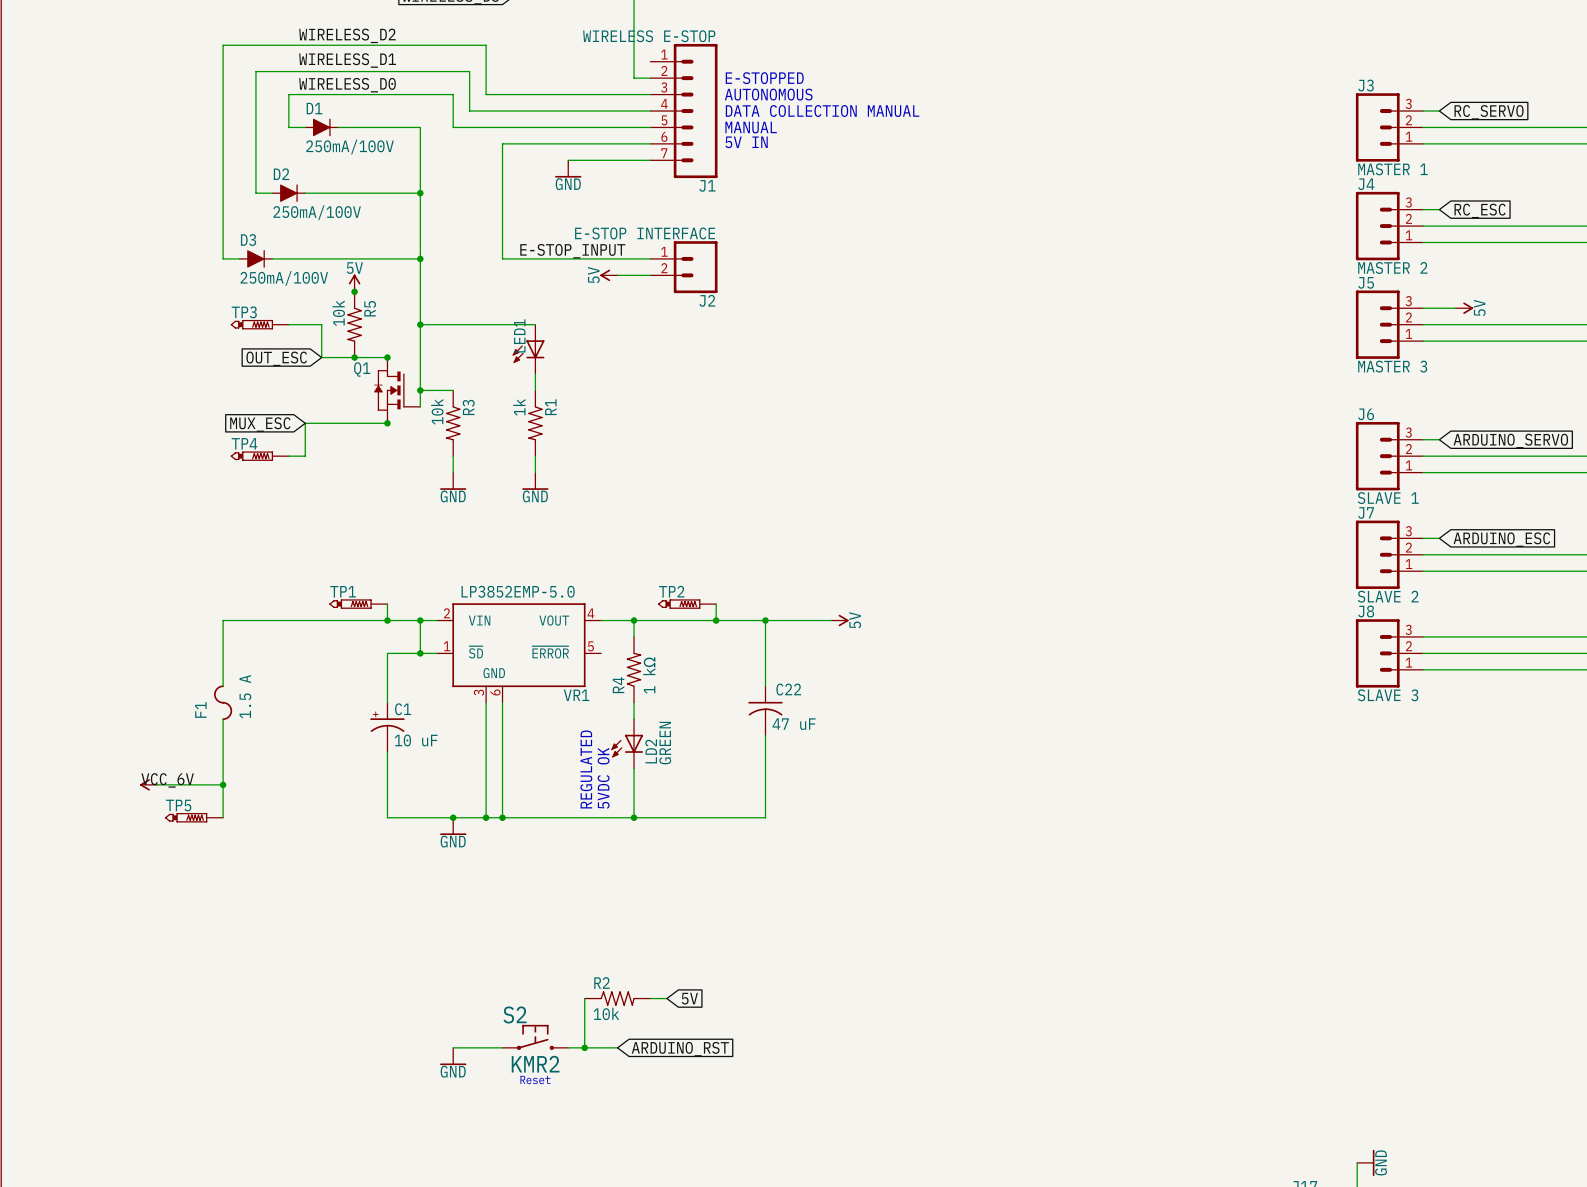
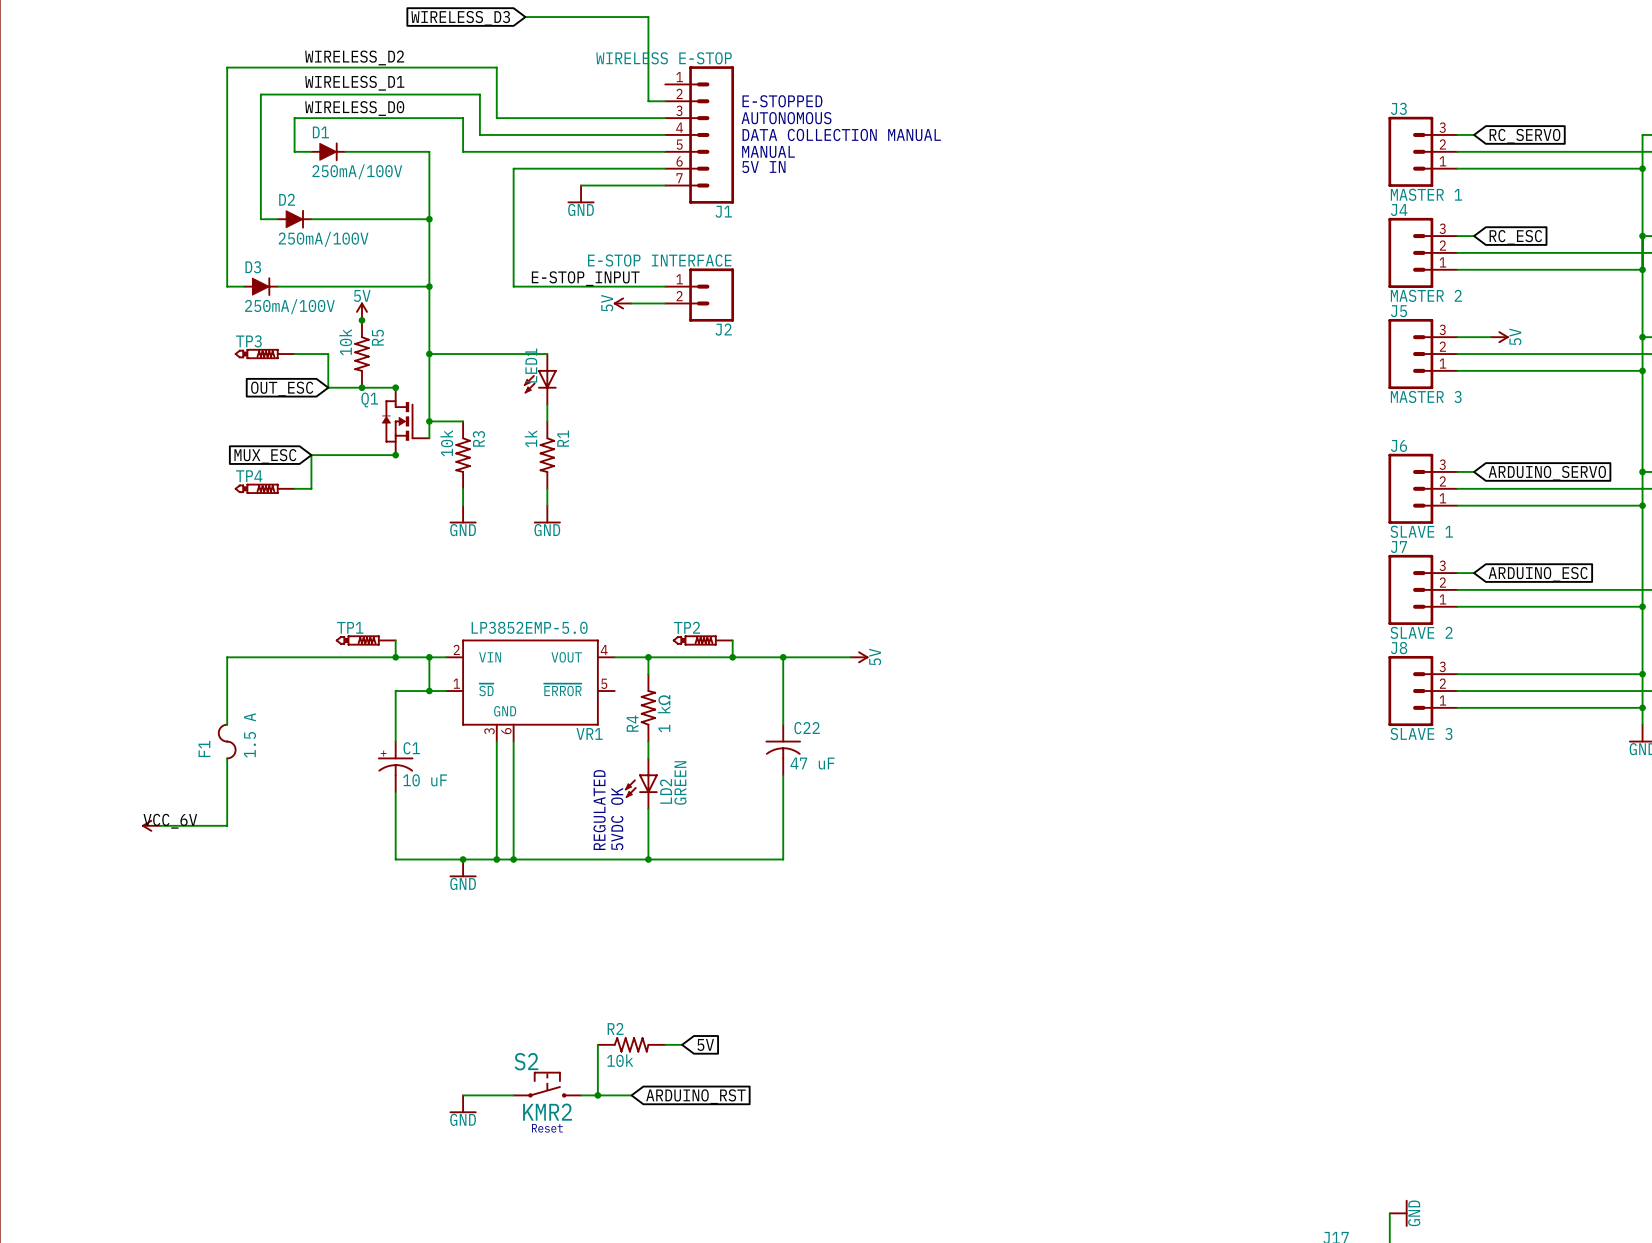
wire: (223, 784) (223, 817) -> none
junction: (223, 784) -> none
TP5: (194, 817) -> none

